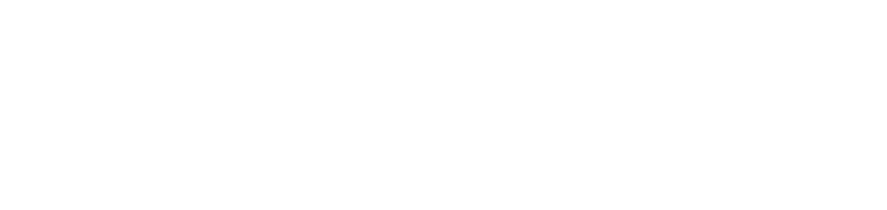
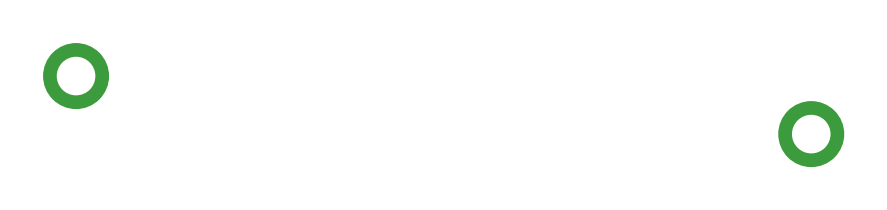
part: none -> (76, 76)
part: none -> (811, 134)

